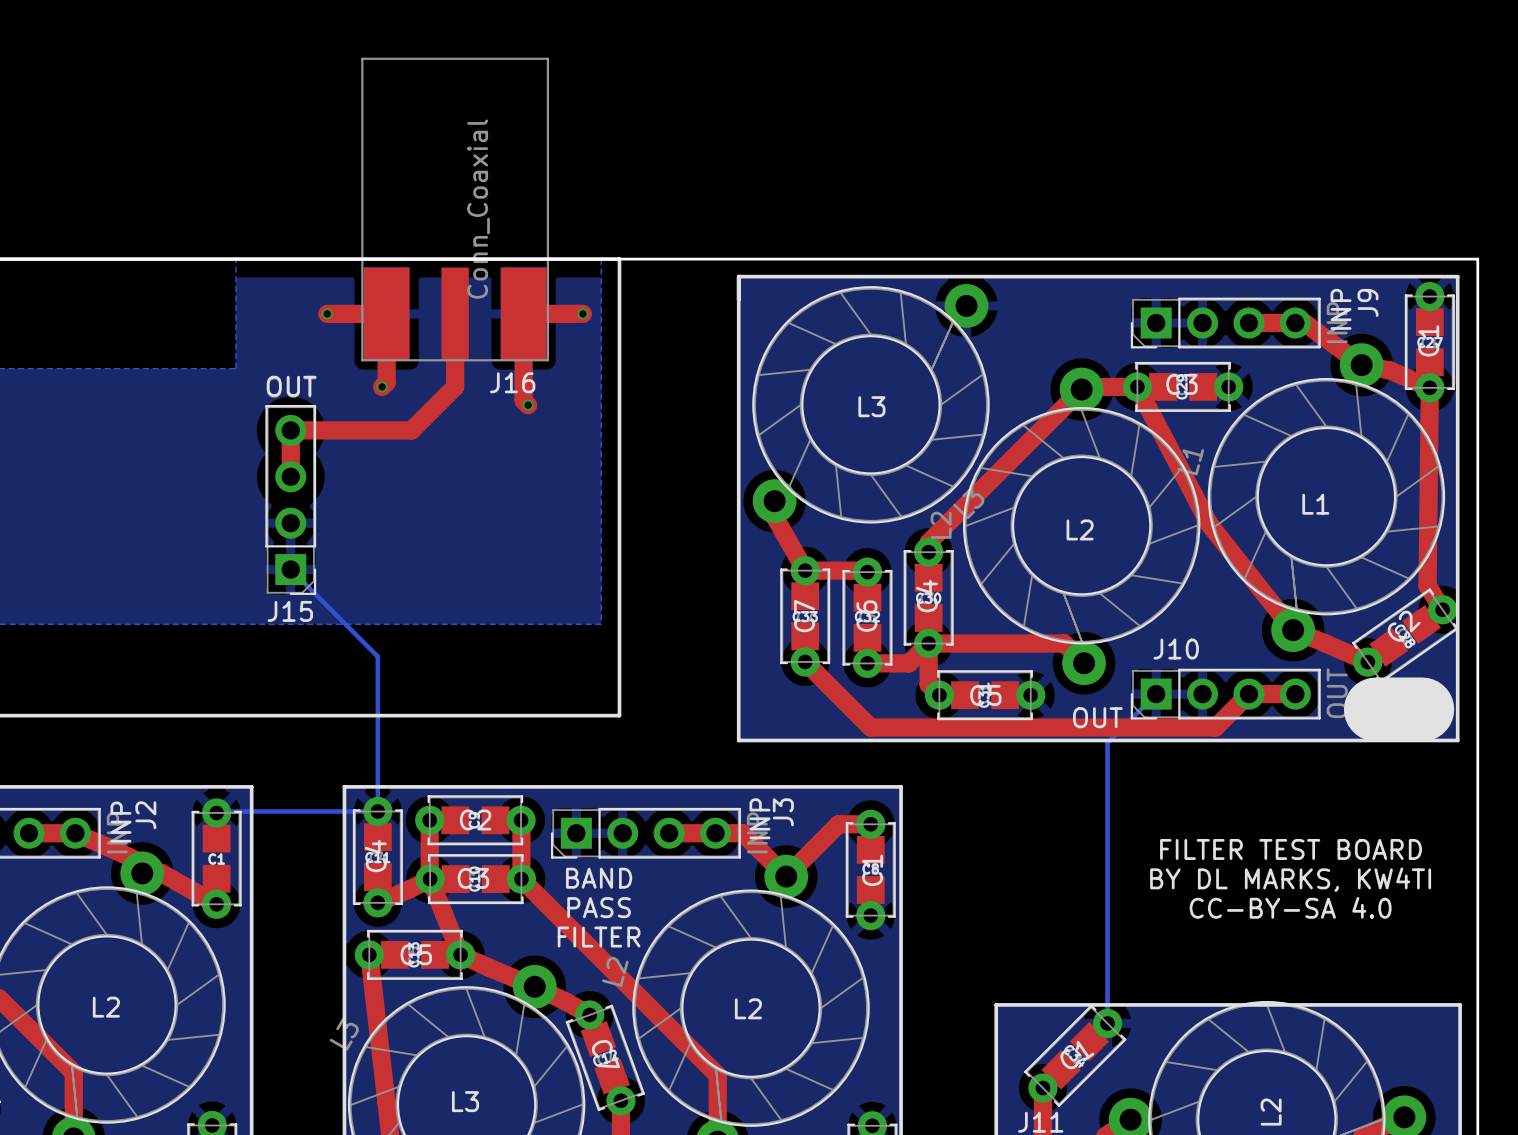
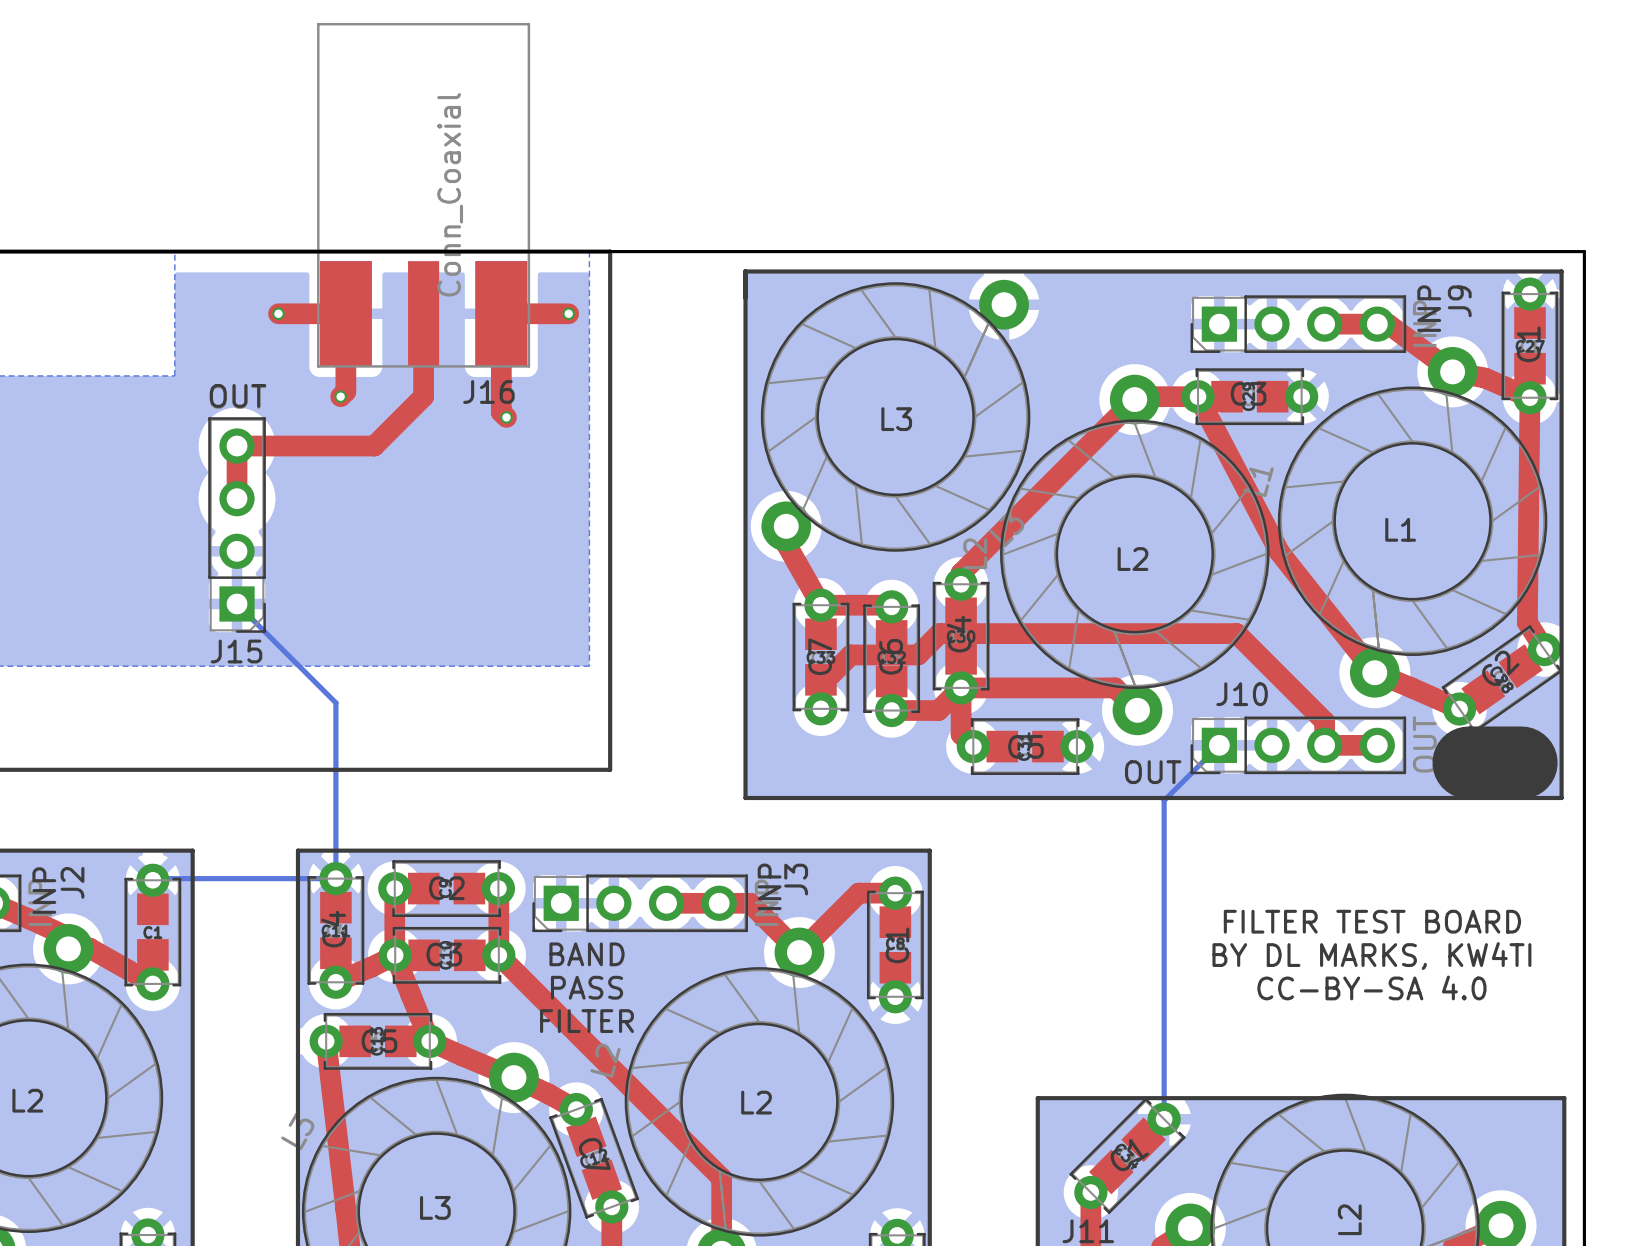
top track: (805, 661) (870, 727) (1215, 727) (1248, 694) -> (820, 685) (851, 654) (918, 654) (939, 633) (1236, 633) (1324, 721) (1324, 745)

